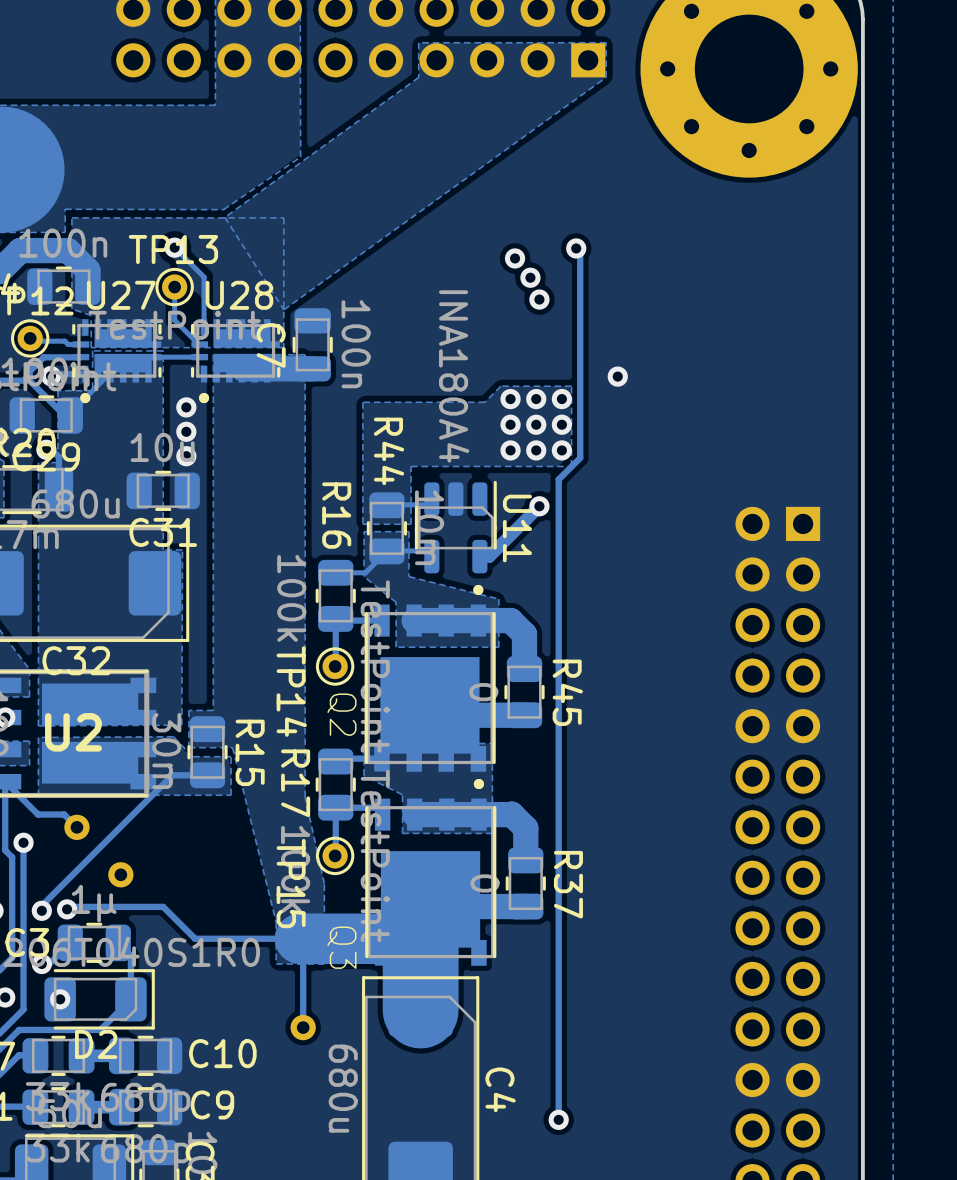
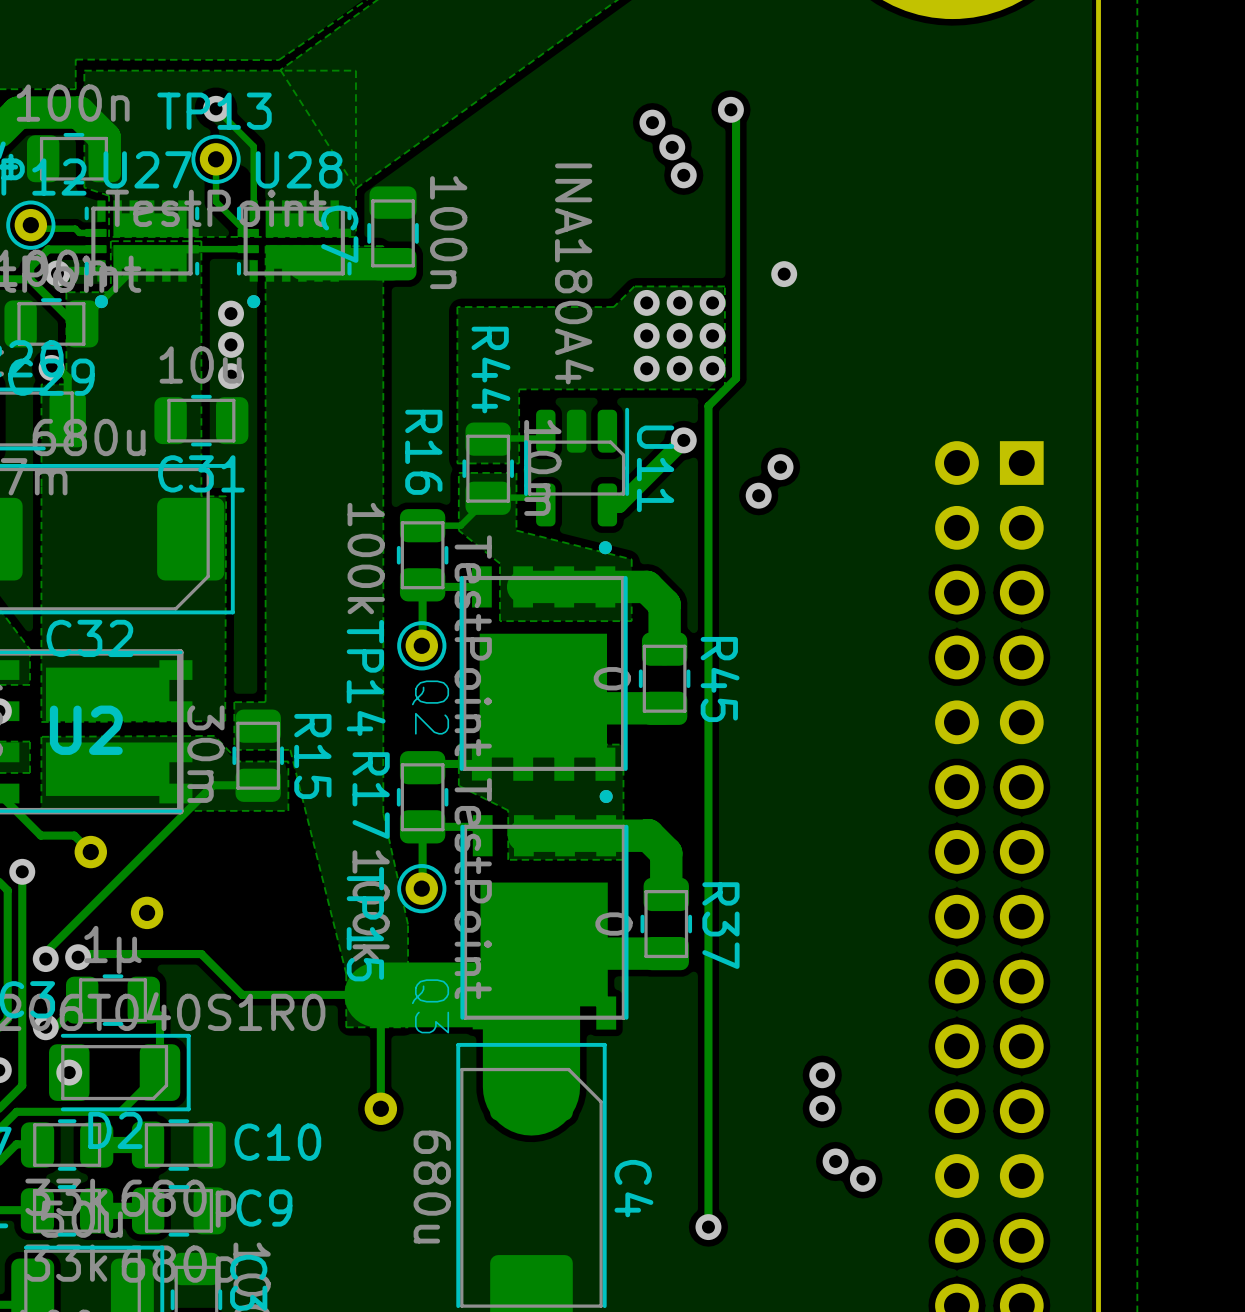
via: none -> (780, 467)
via: none -> (758, 495)
via: none -> (822, 1075)
via: none -> (822, 1108)
via: none -> (835, 1161)
via: none -> (862, 1178)

